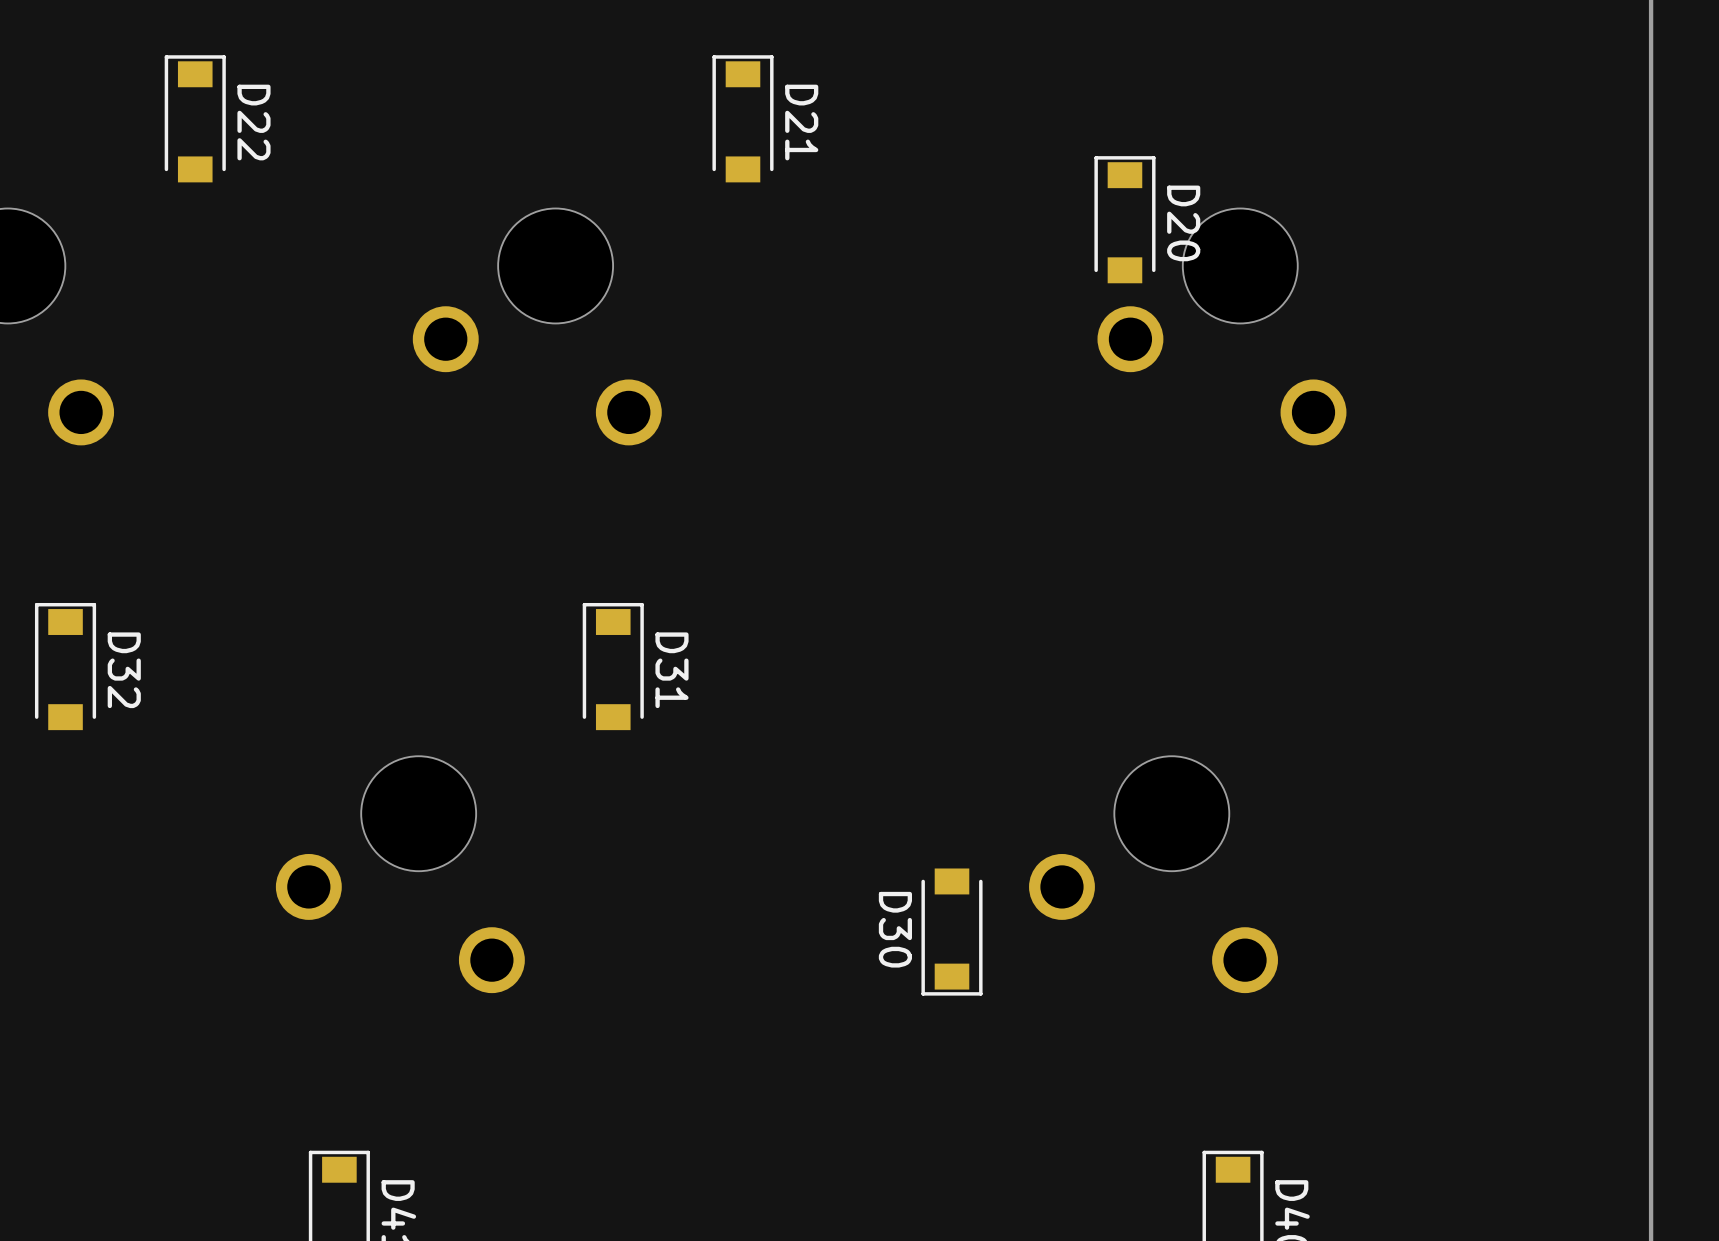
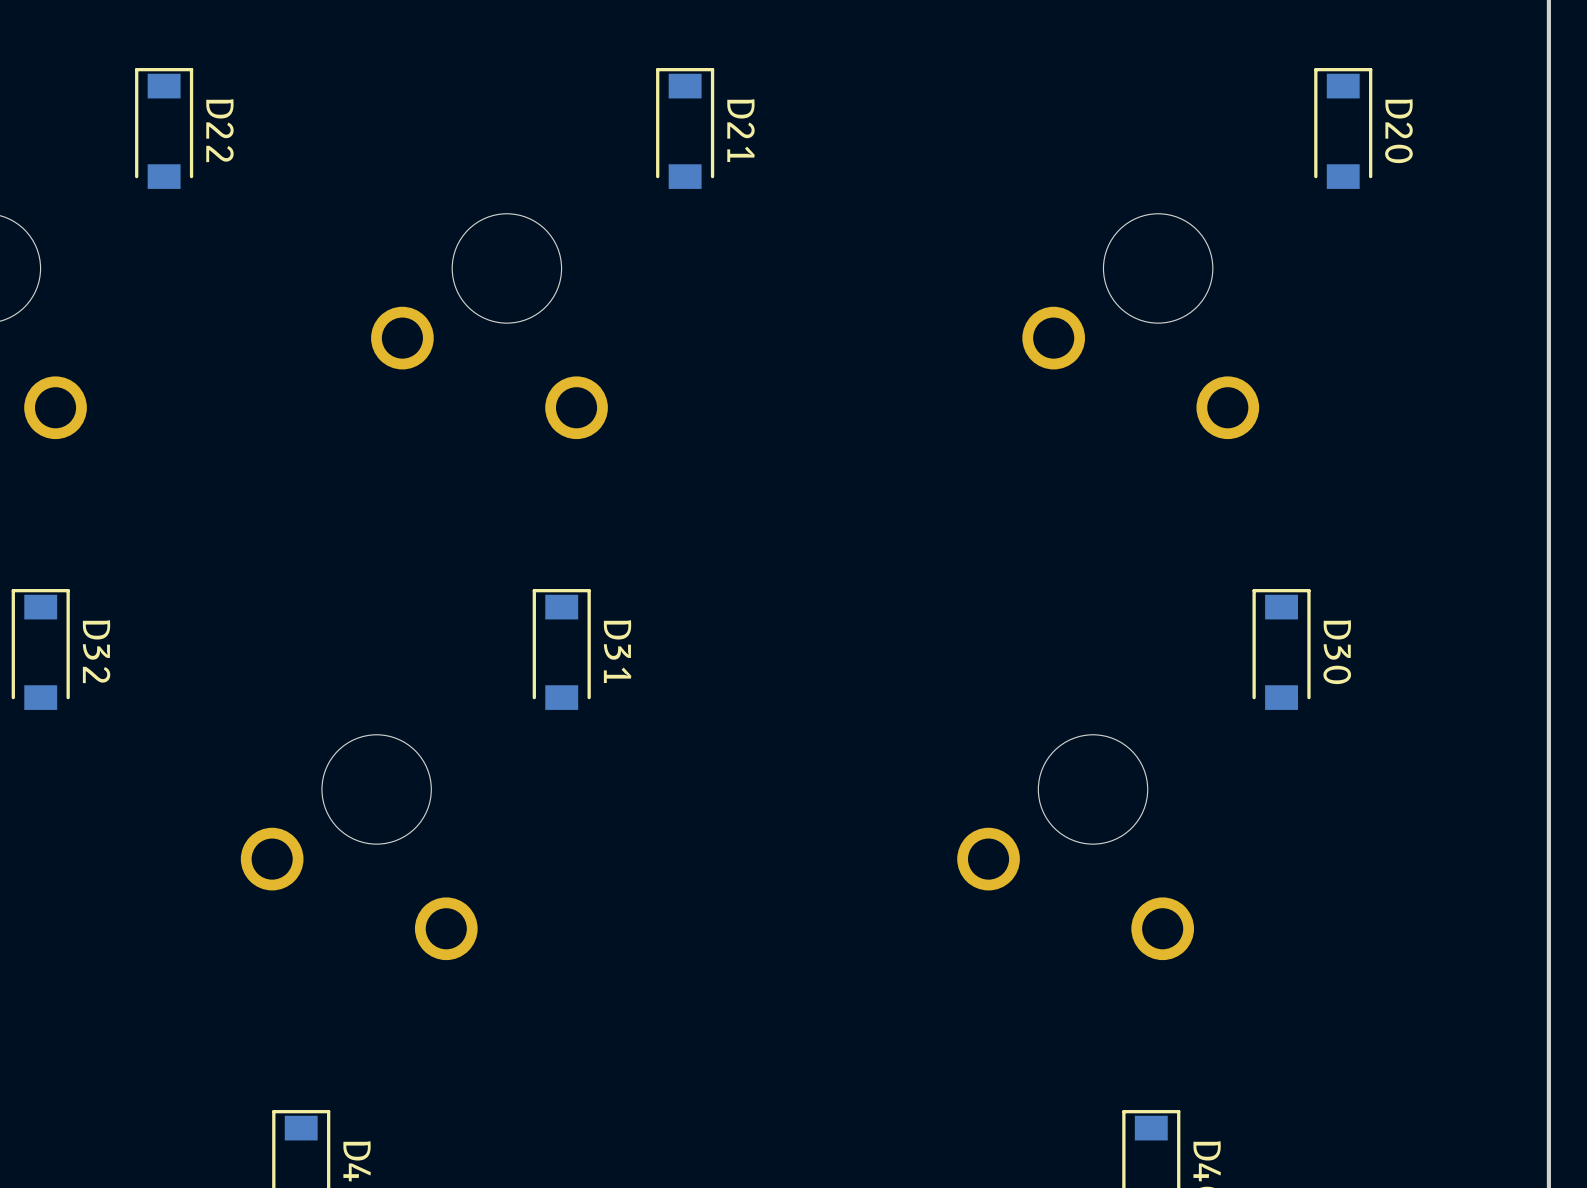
D20 position: (1124, 219) -> (1343, 128)
D30 rotation: 0° (951, 932) -> 180° (1281, 649)
D30 position: (951, 932) -> (1281, 649)

